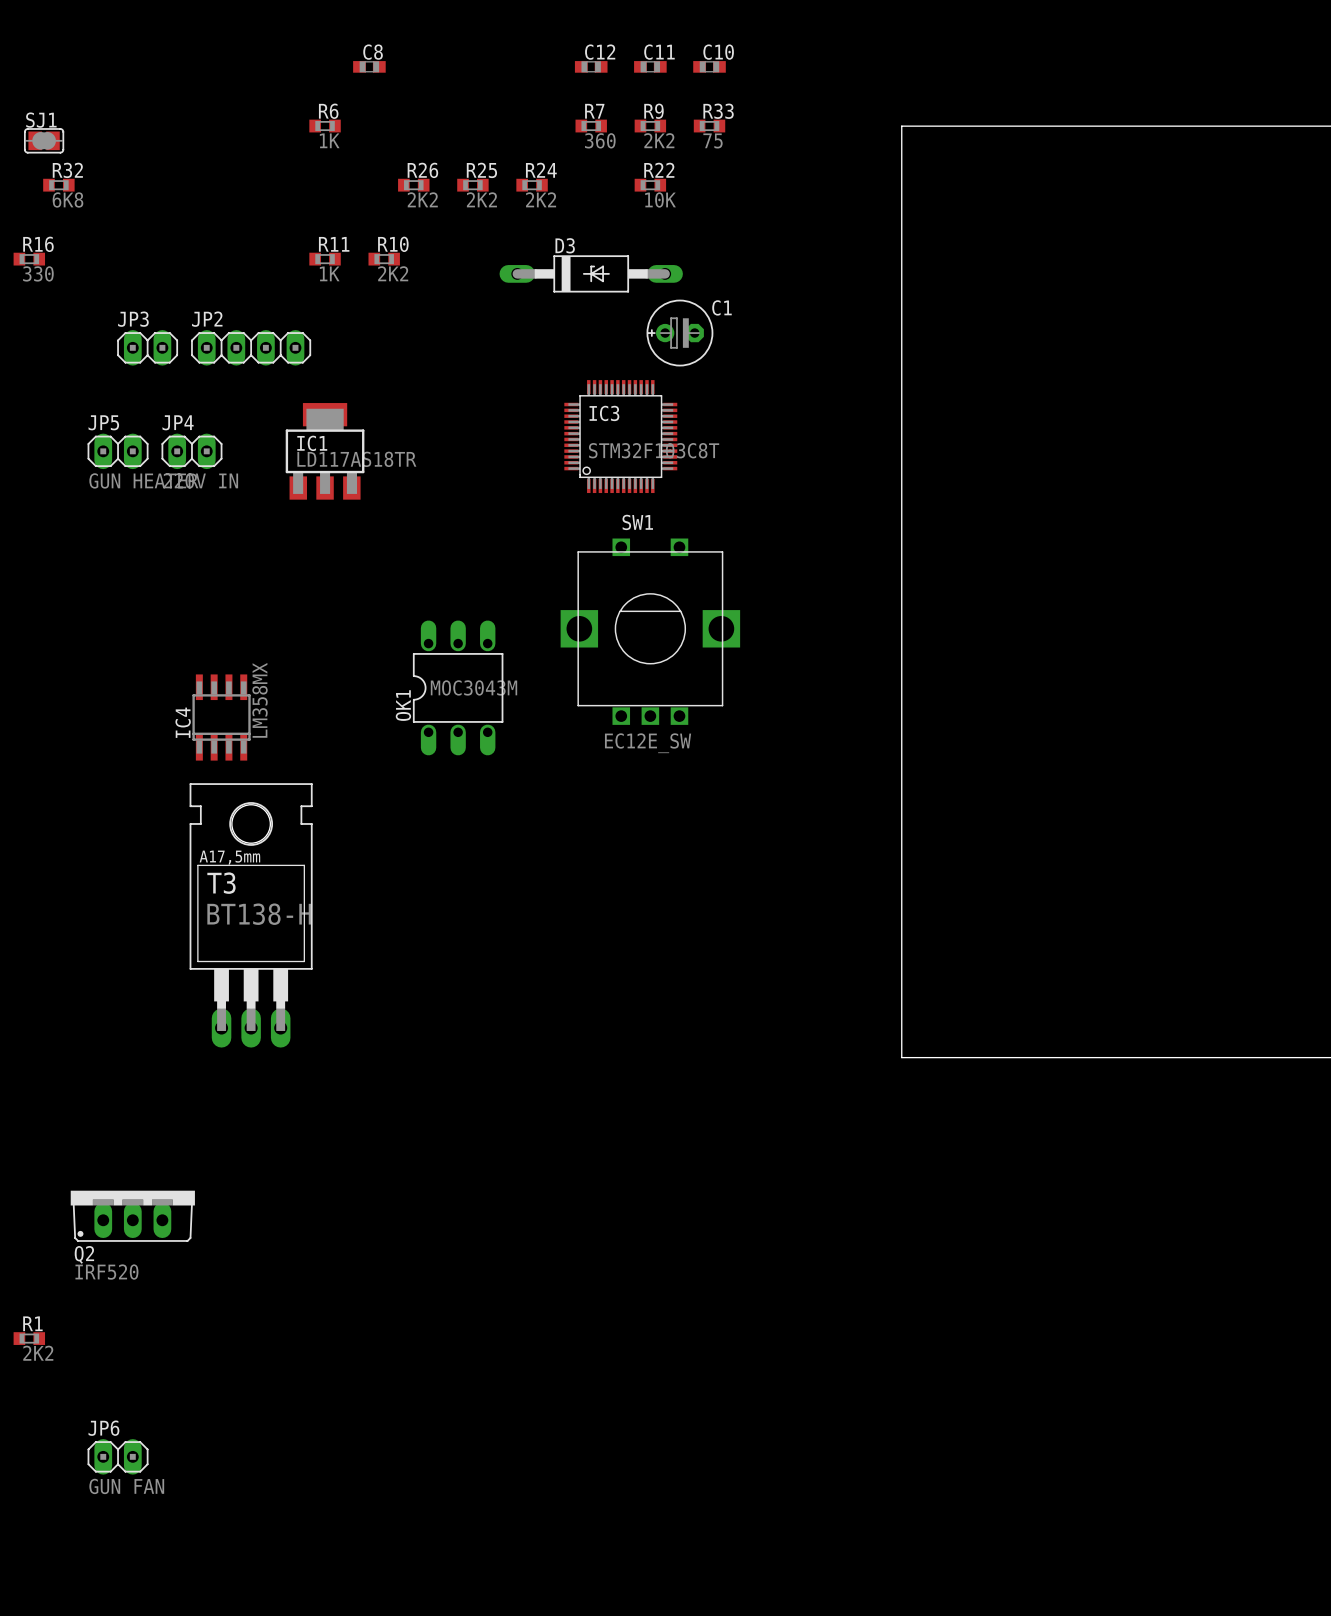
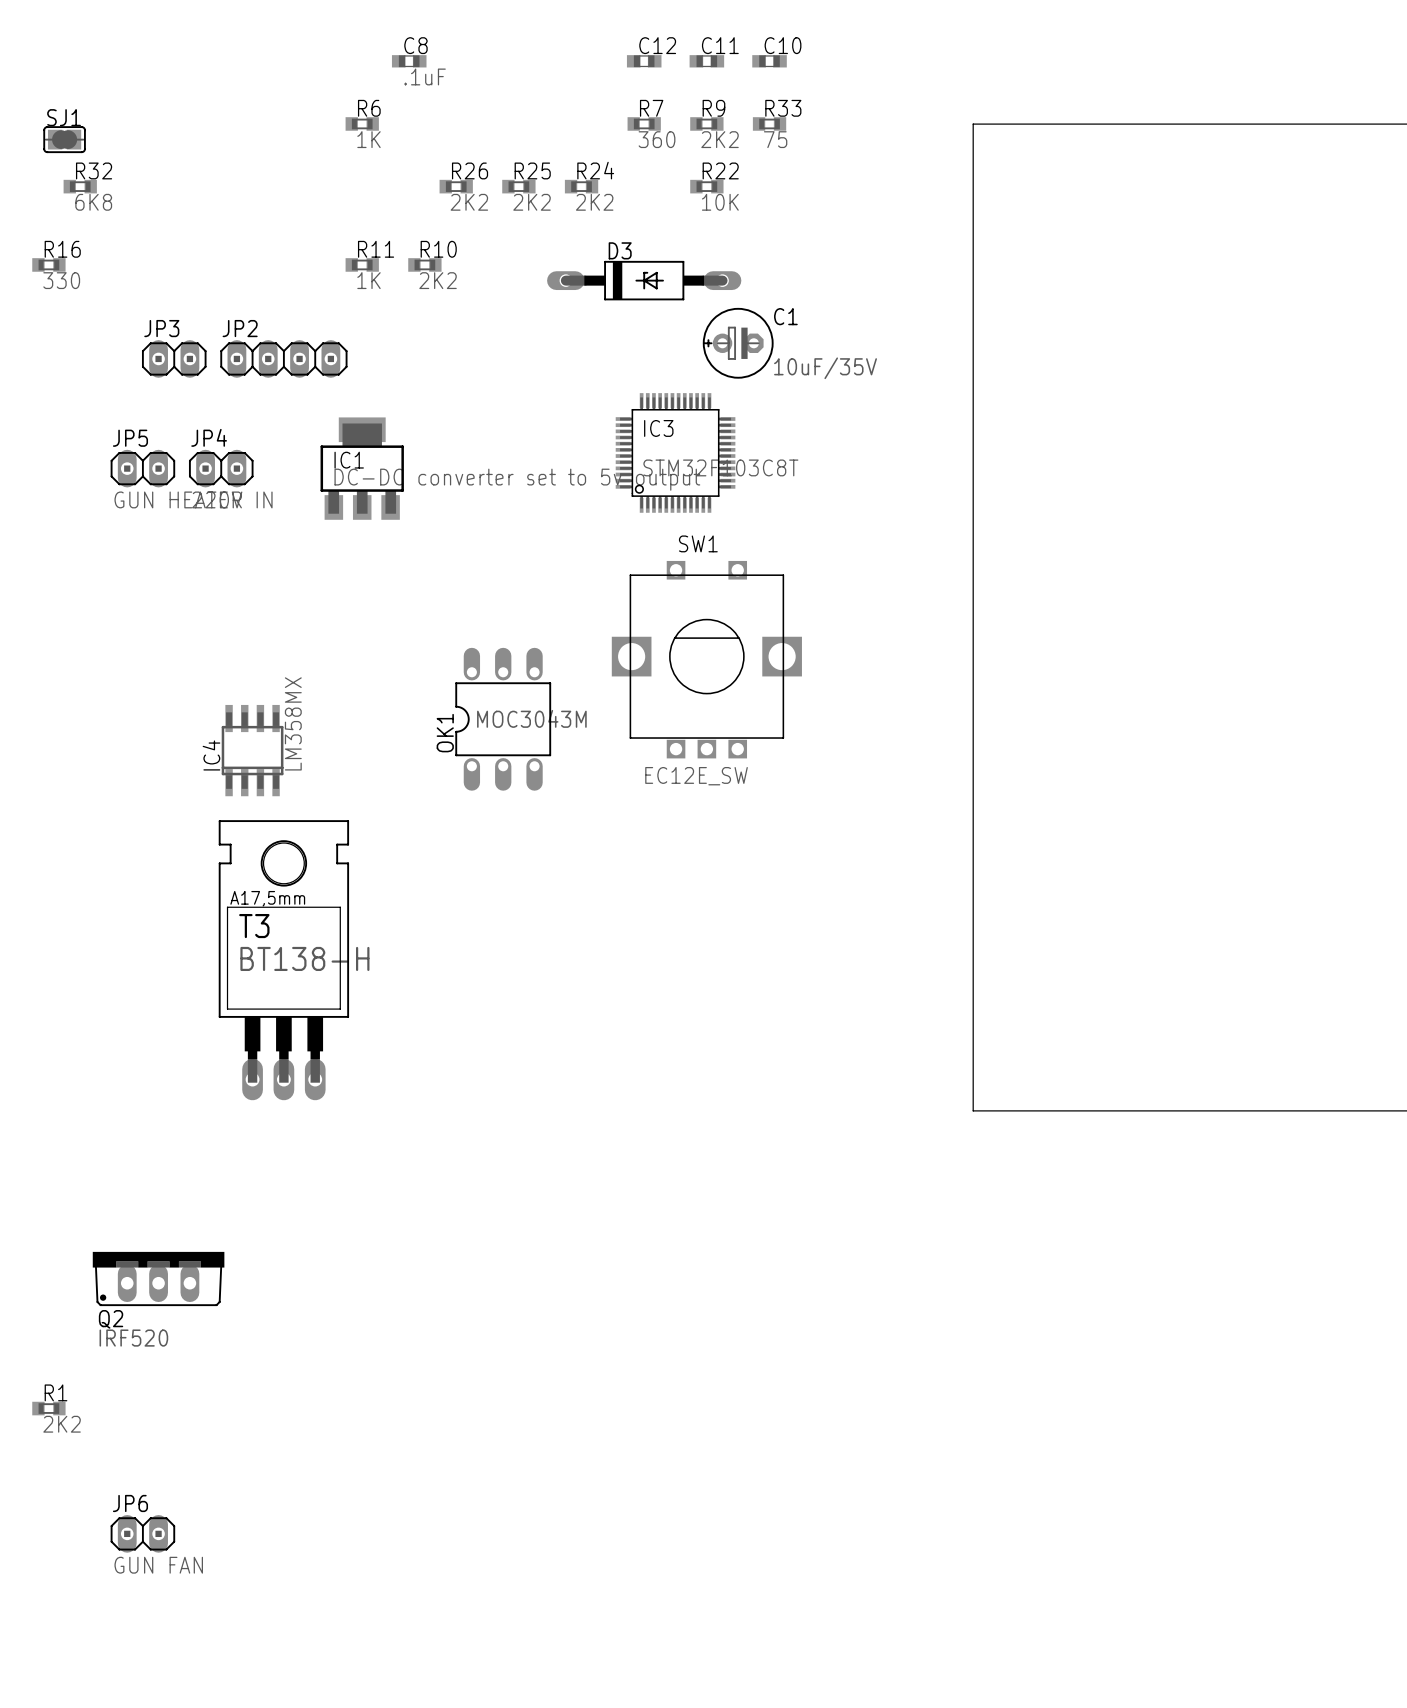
C8 value: none -> .1uF (425, 76)
C1 value: none -> 10uF/35V (825, 368)
IC1 value: LD117AS18TR (356, 459) -> DC-DC converter set to 5v output (517, 479)

